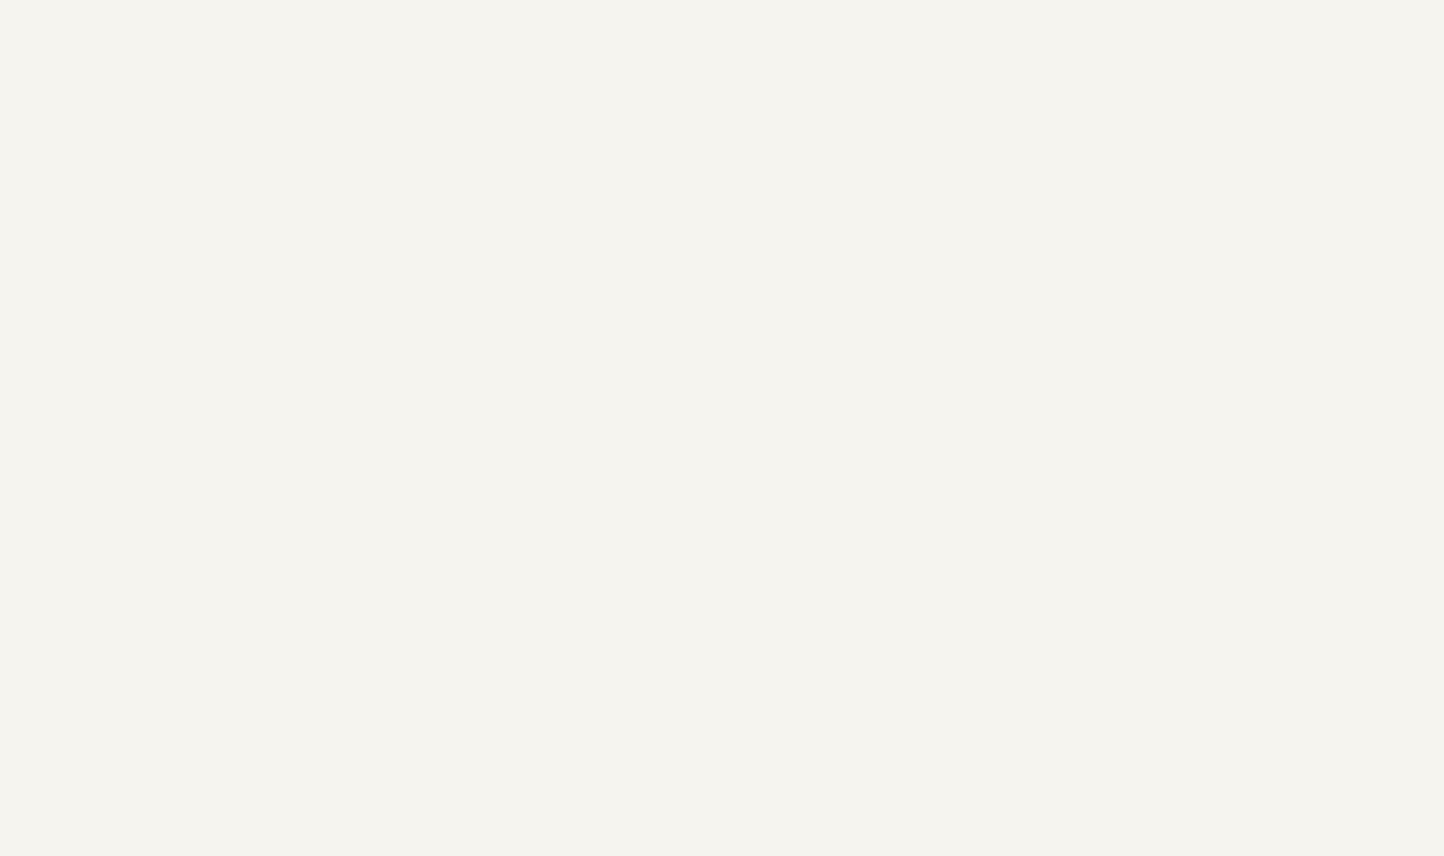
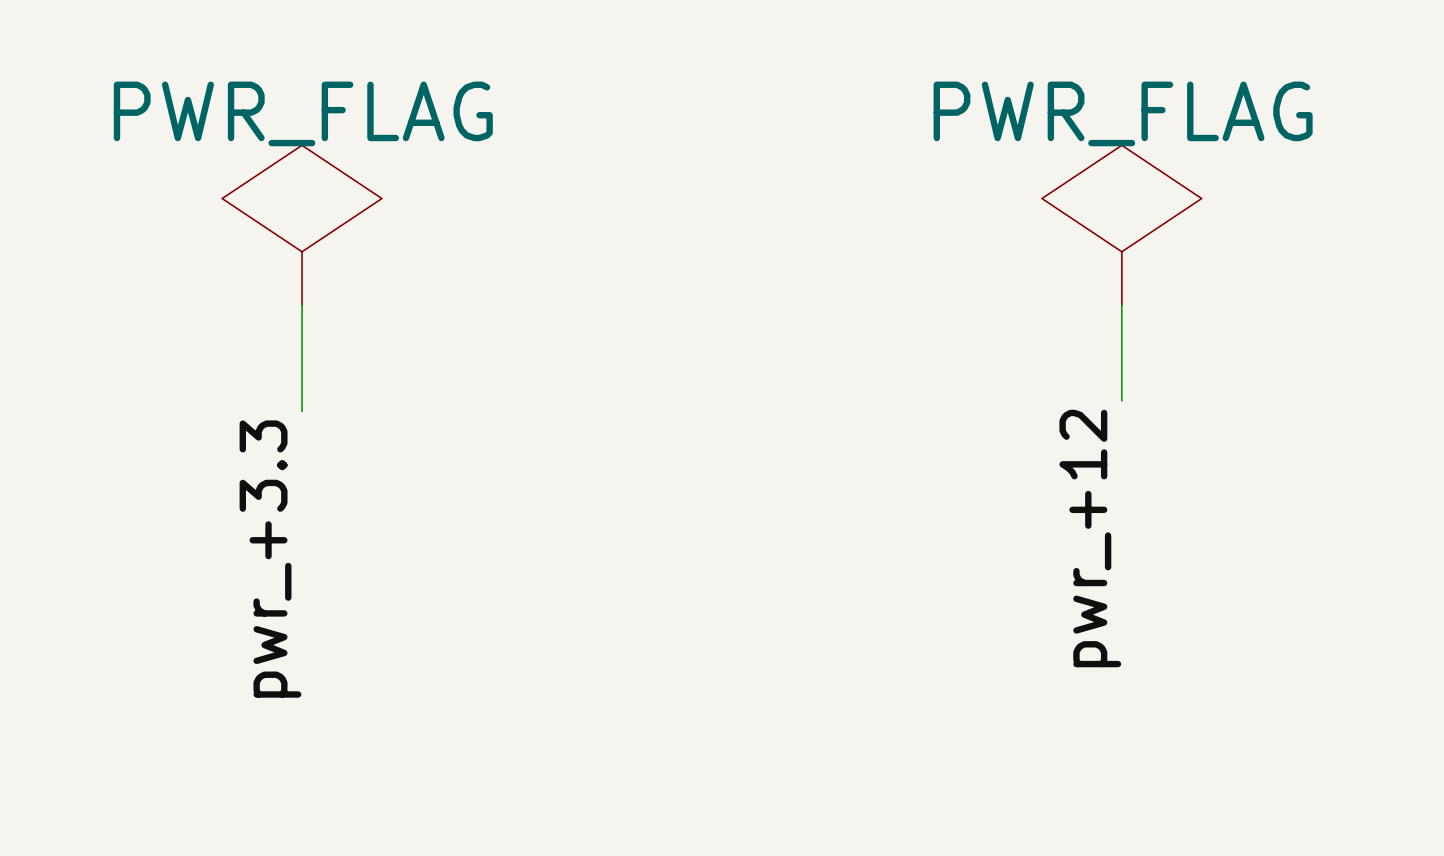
power symbol: none -> PWR_FLAG (302, 225)
power symbol: none -> PWR_FLAG (1121, 225)
wire: none -> (302, 305) (302, 411)
wire: none -> (1121, 305) (1121, 400)
label: none -> pwr_+12 (1090, 538)
label: none -> pwr_+3.3 (270, 559)

